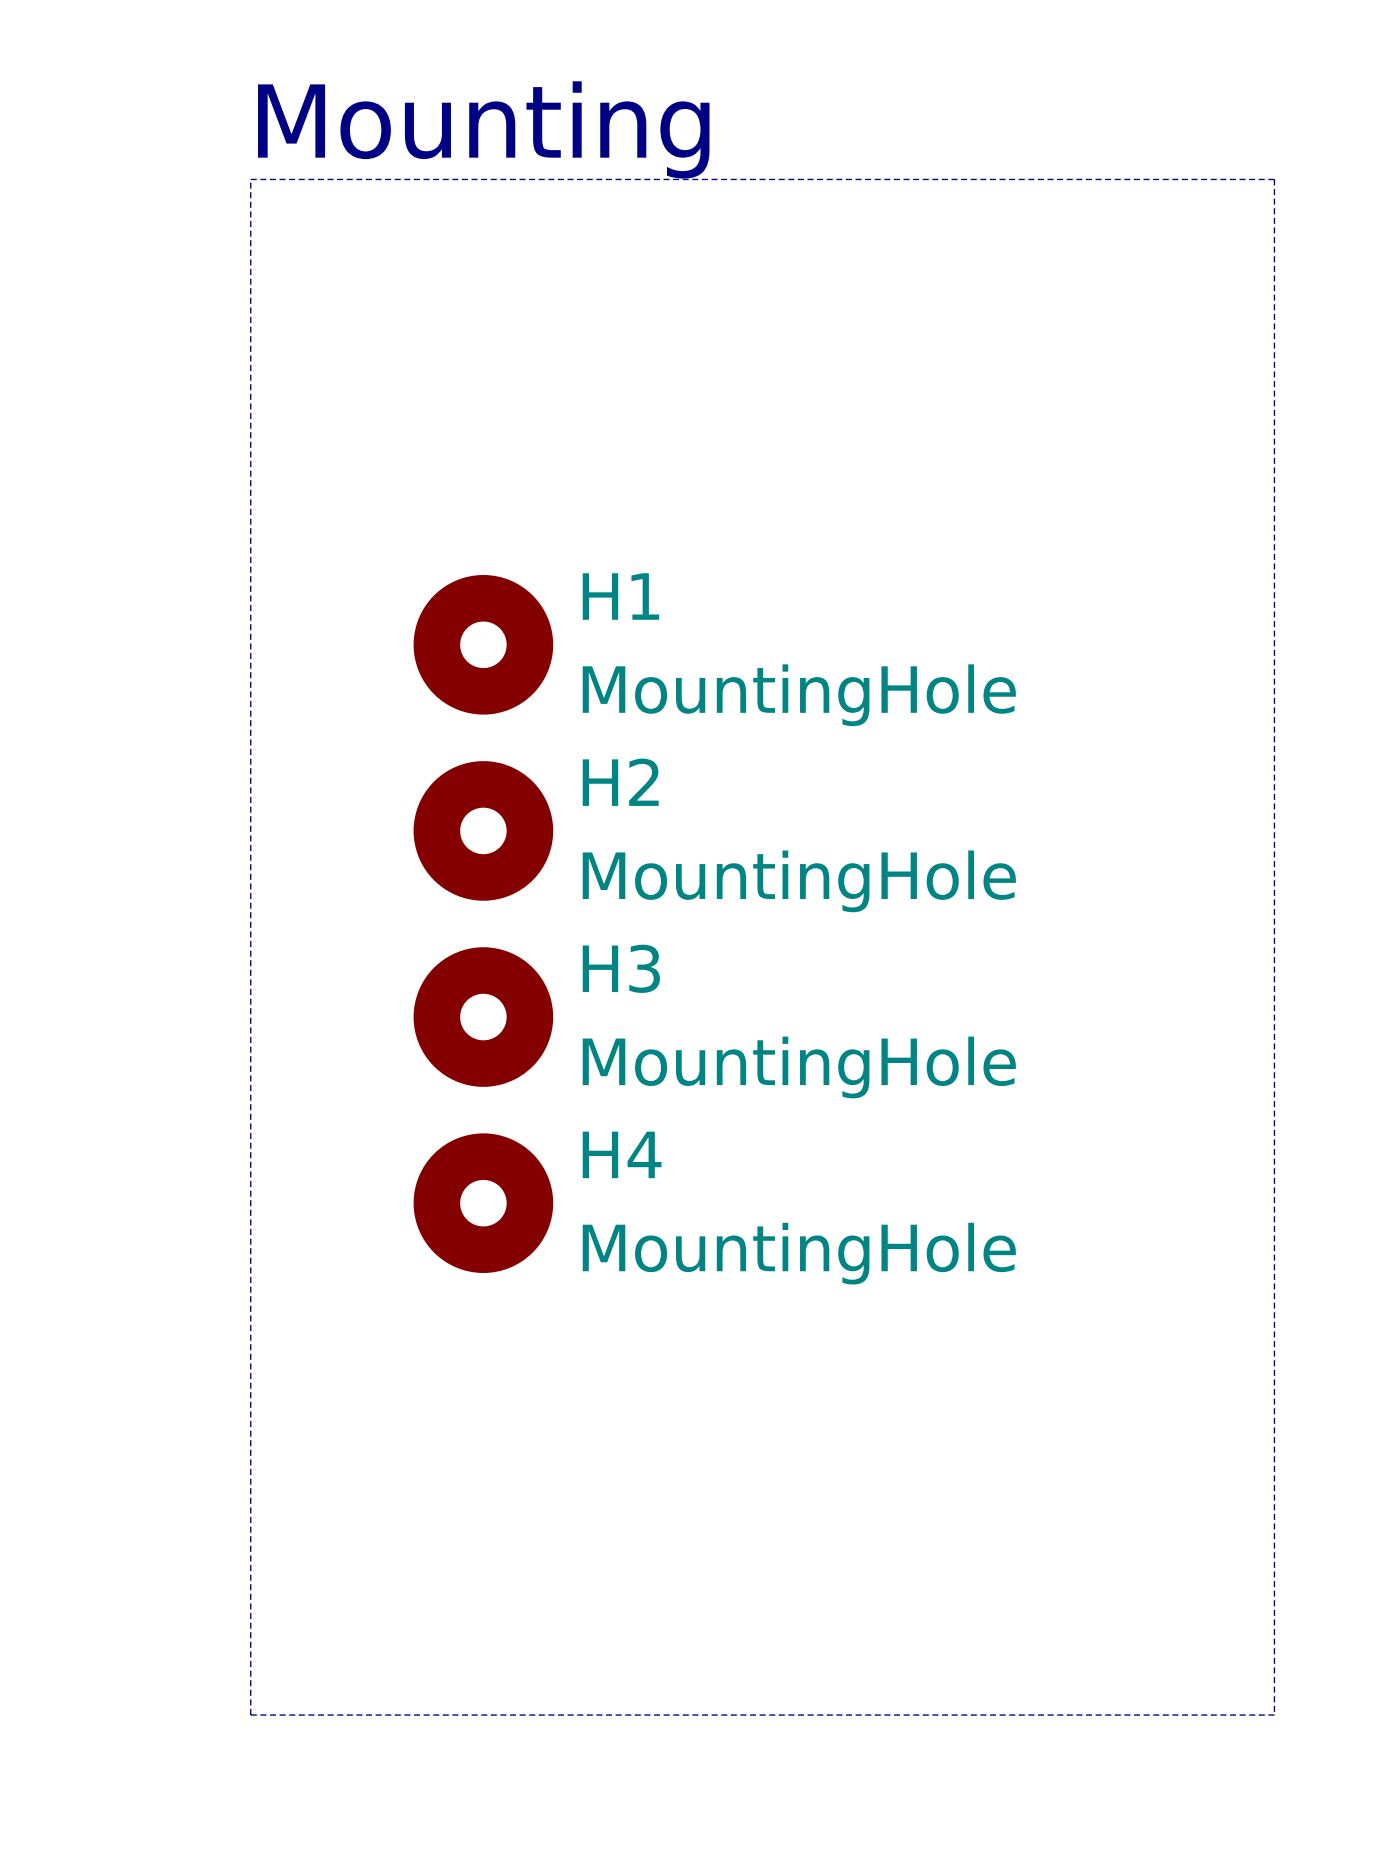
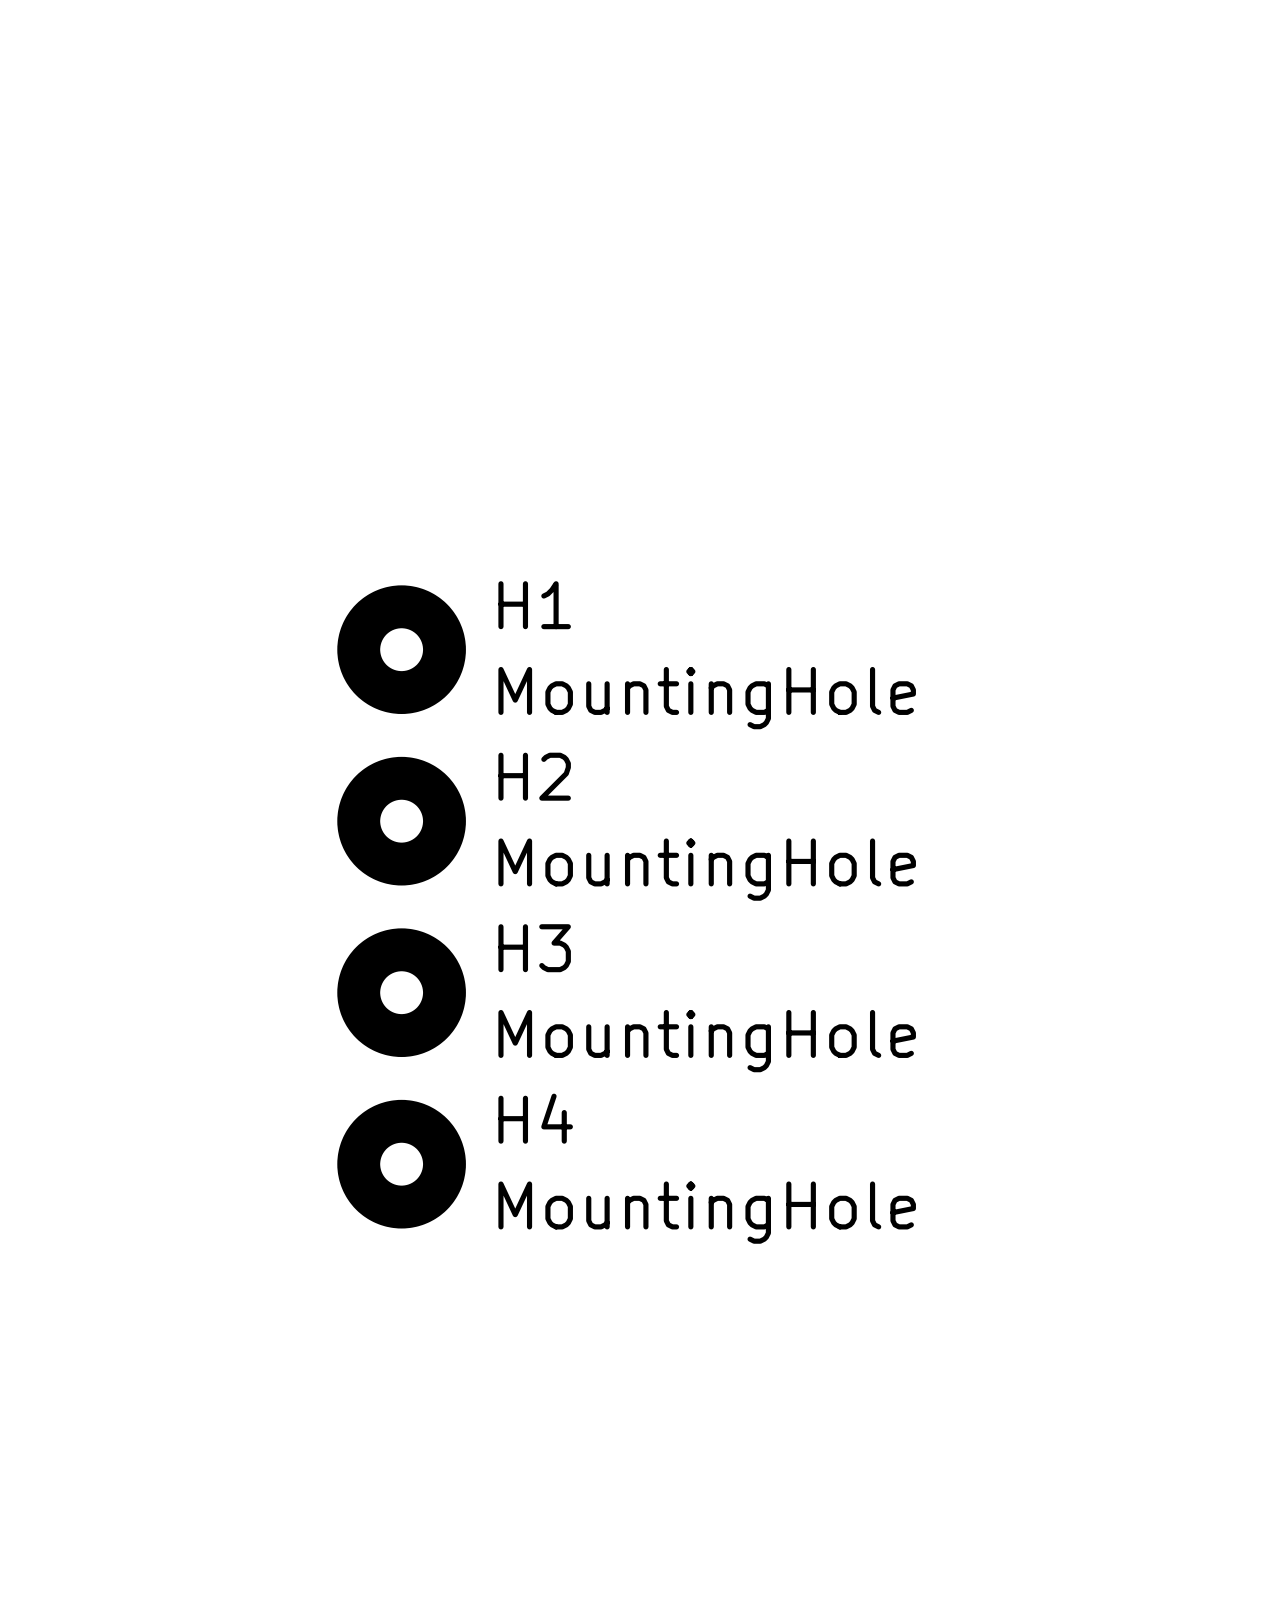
text: Mounting (483, 129) -> none
line: (250, 179) (1274, 179) (1274, 1715) (250, 1715) (250, 179) -> none
H1 position: (483, 644) -> (401, 649)
H2 position: (483, 830) -> (401, 821)
H3 position: (483, 1017) -> (401, 992)
H4 position: (483, 1203) -> (401, 1164)

